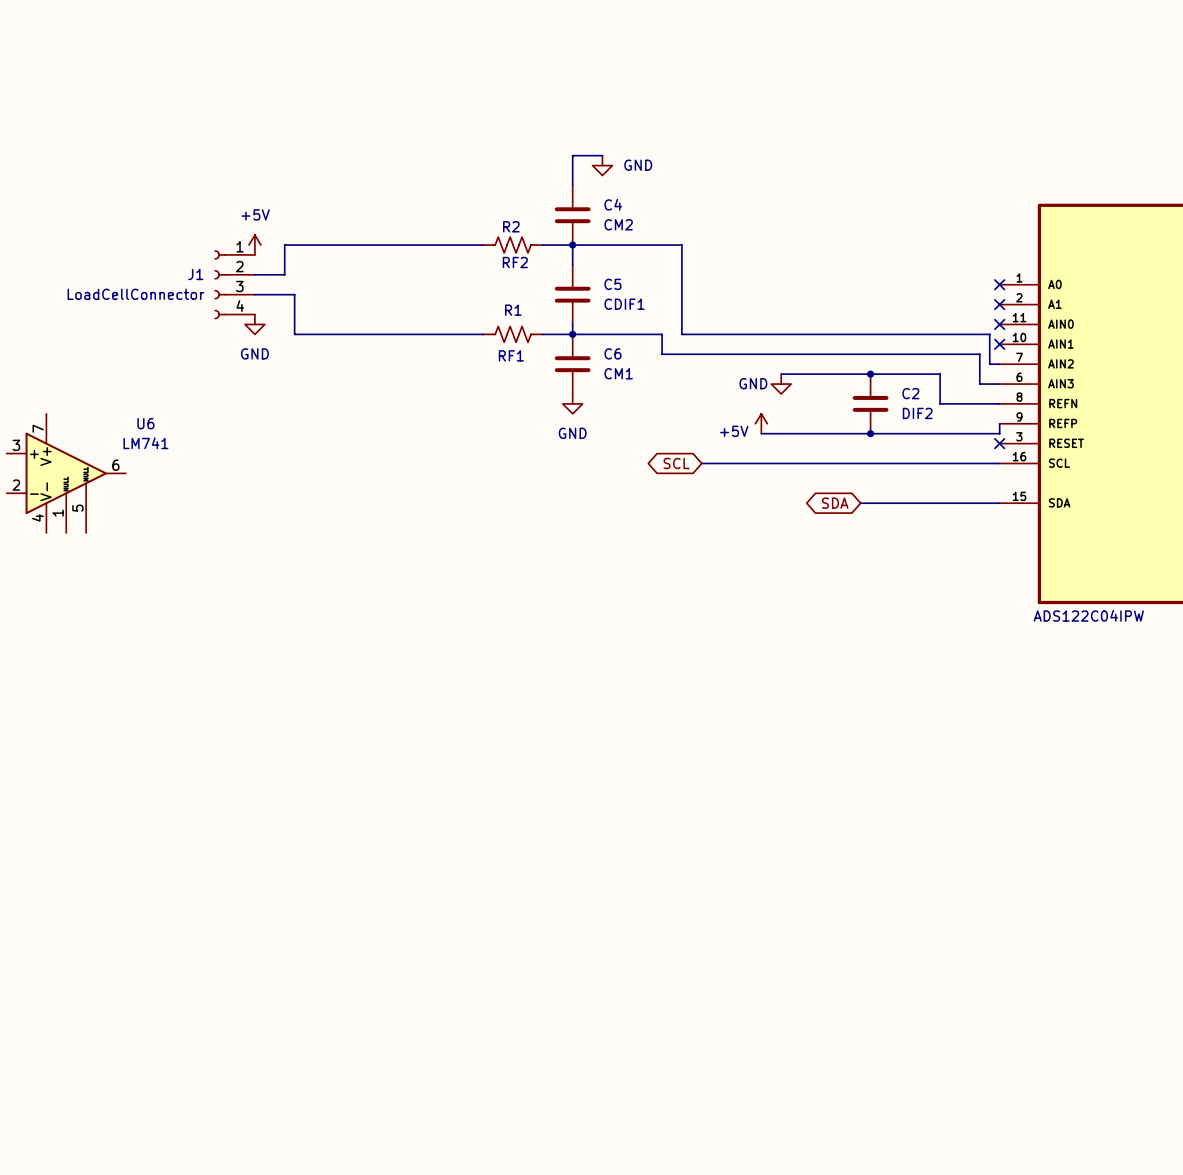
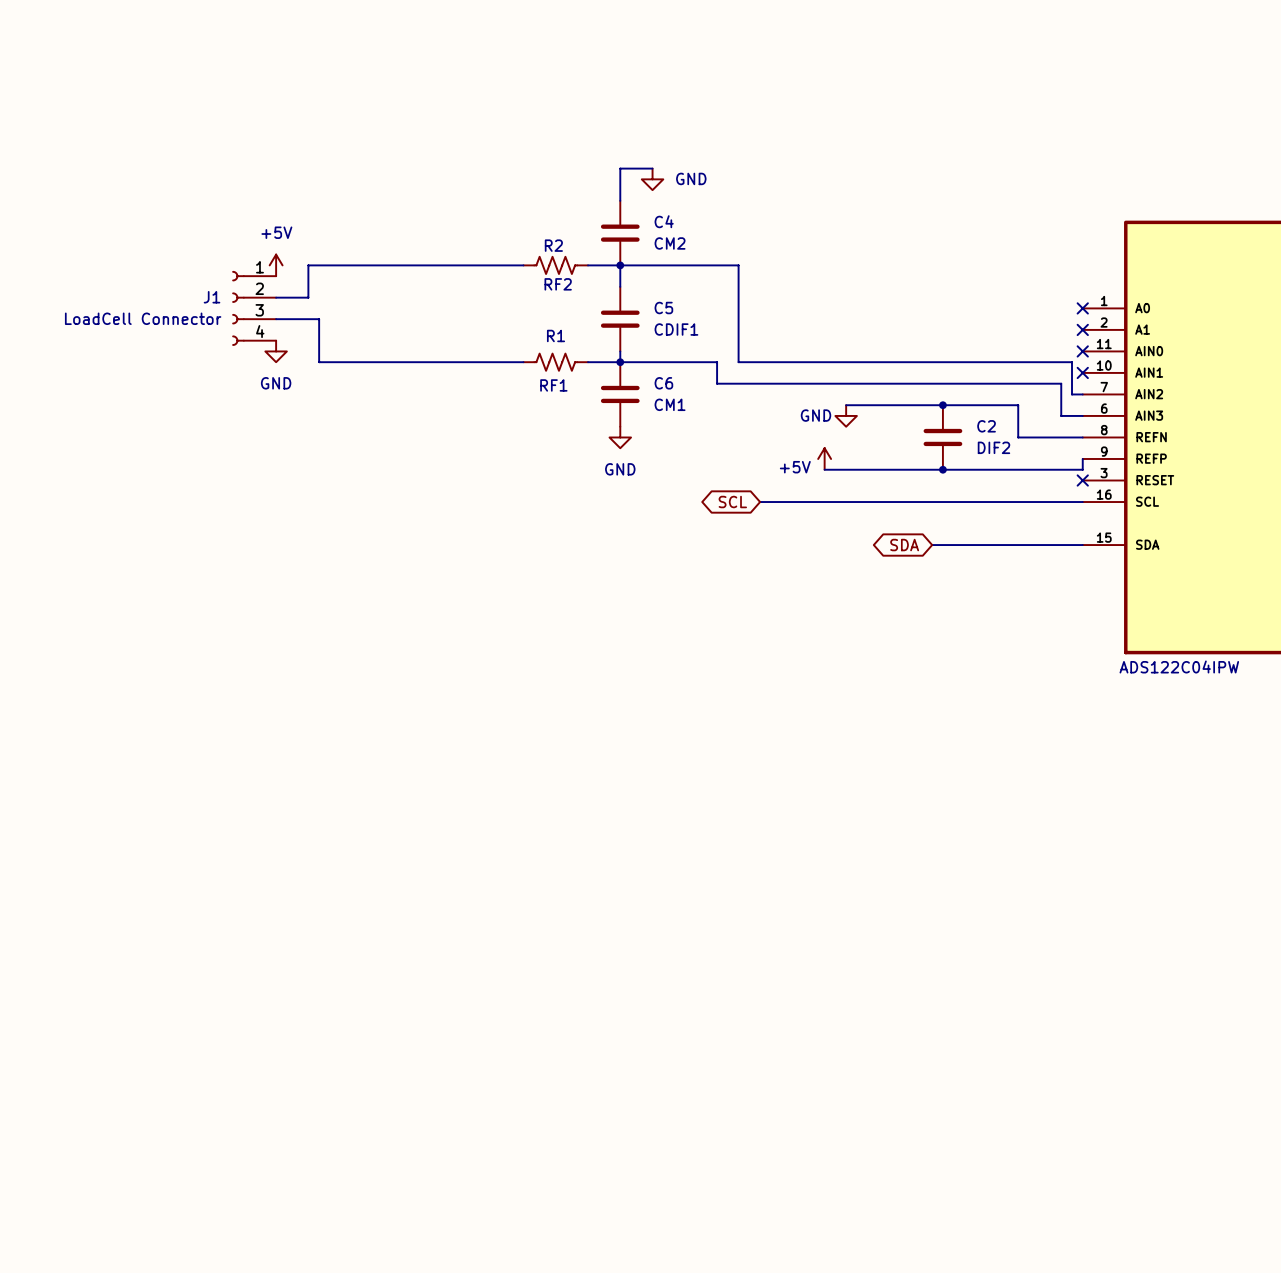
J1 value: LoadCellConnector (135, 294) -> LoadCell Connector (143, 318)
U6: LM741 (66, 473) -> none

